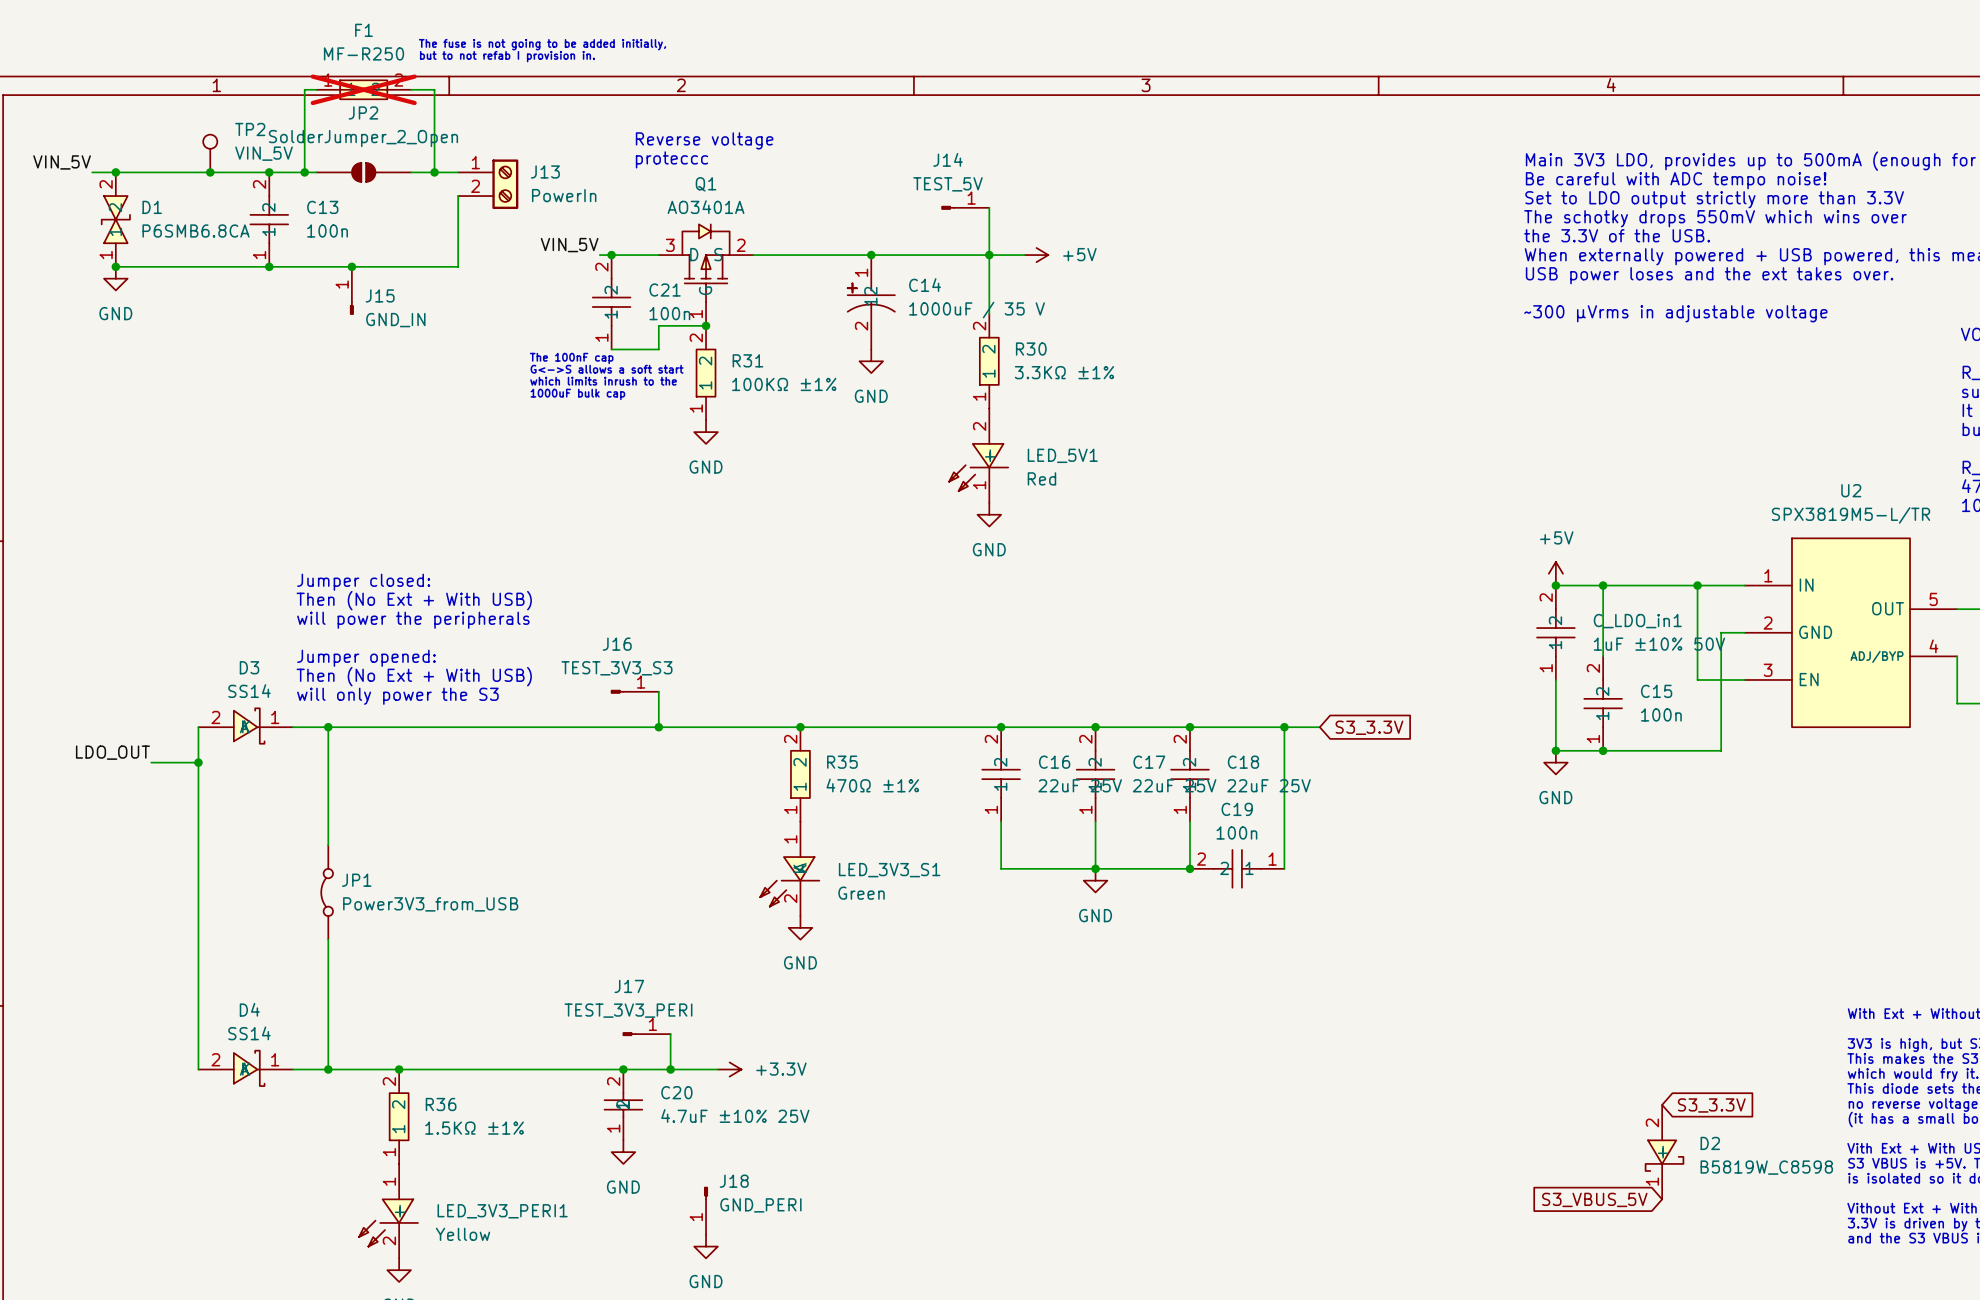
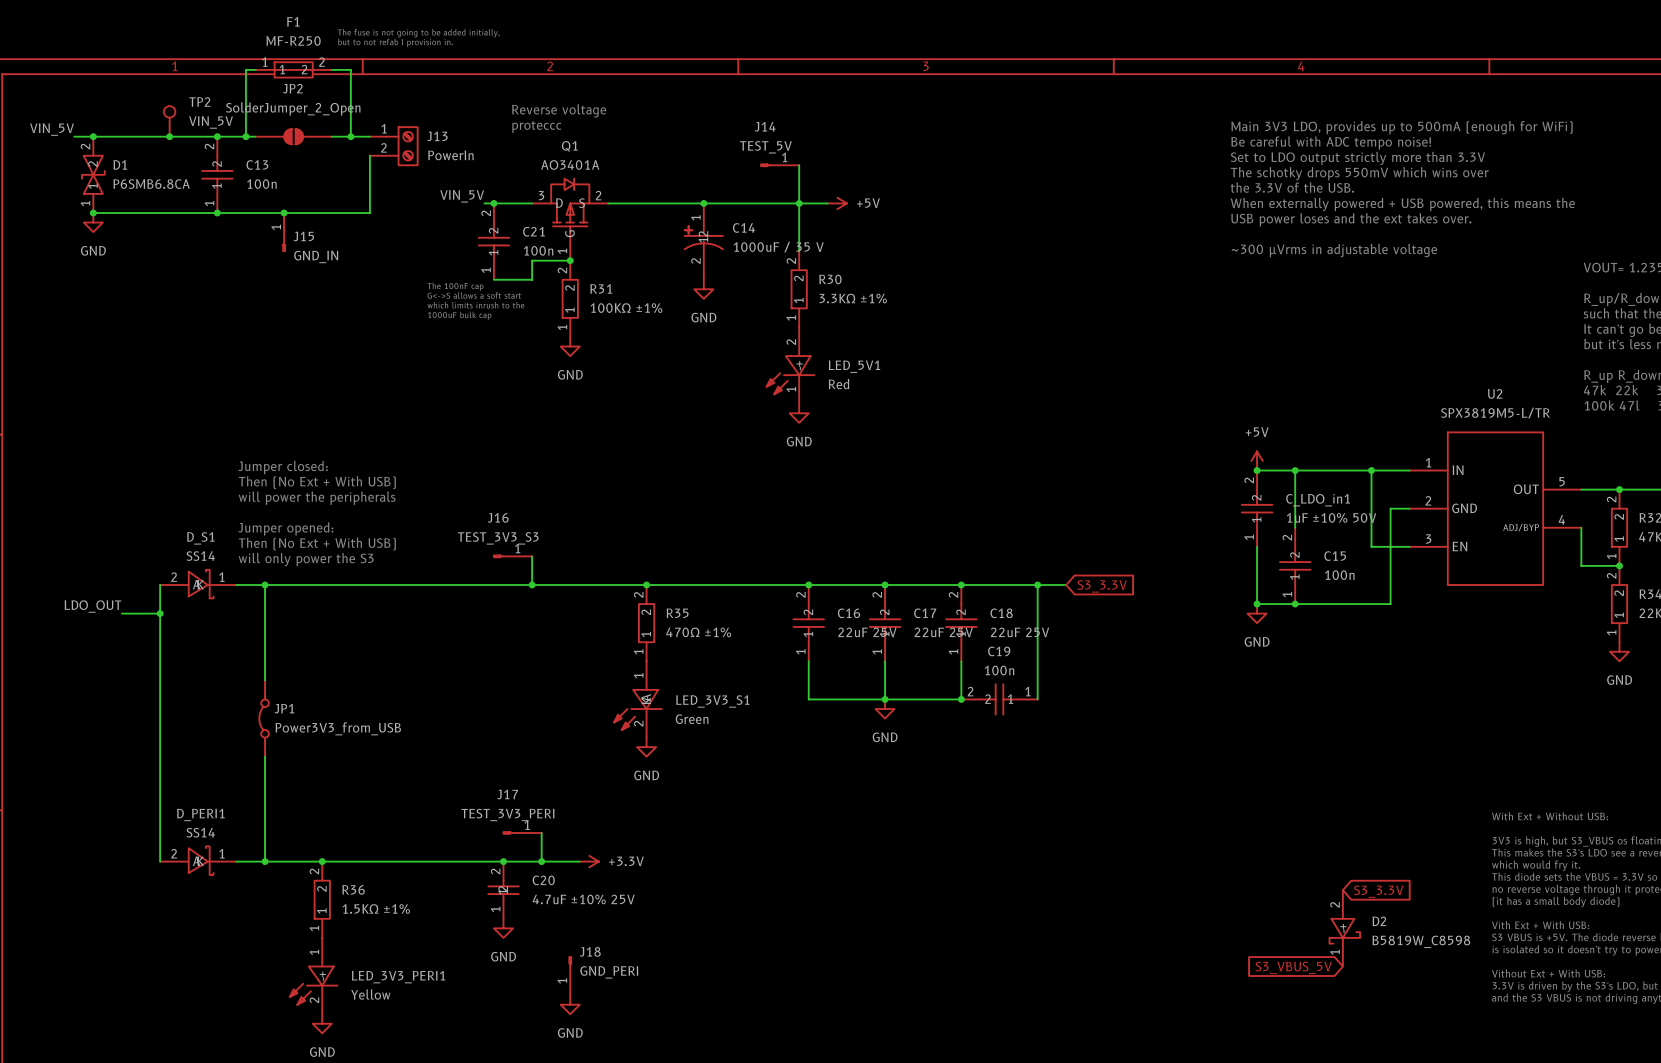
F1 do-not-place cross: (363, 89) -> none
D3 name: D3 (249, 667) -> D_S1 (200, 538)
D4 name: D4 (249, 1009) -> D_PERI1 (200, 814)

